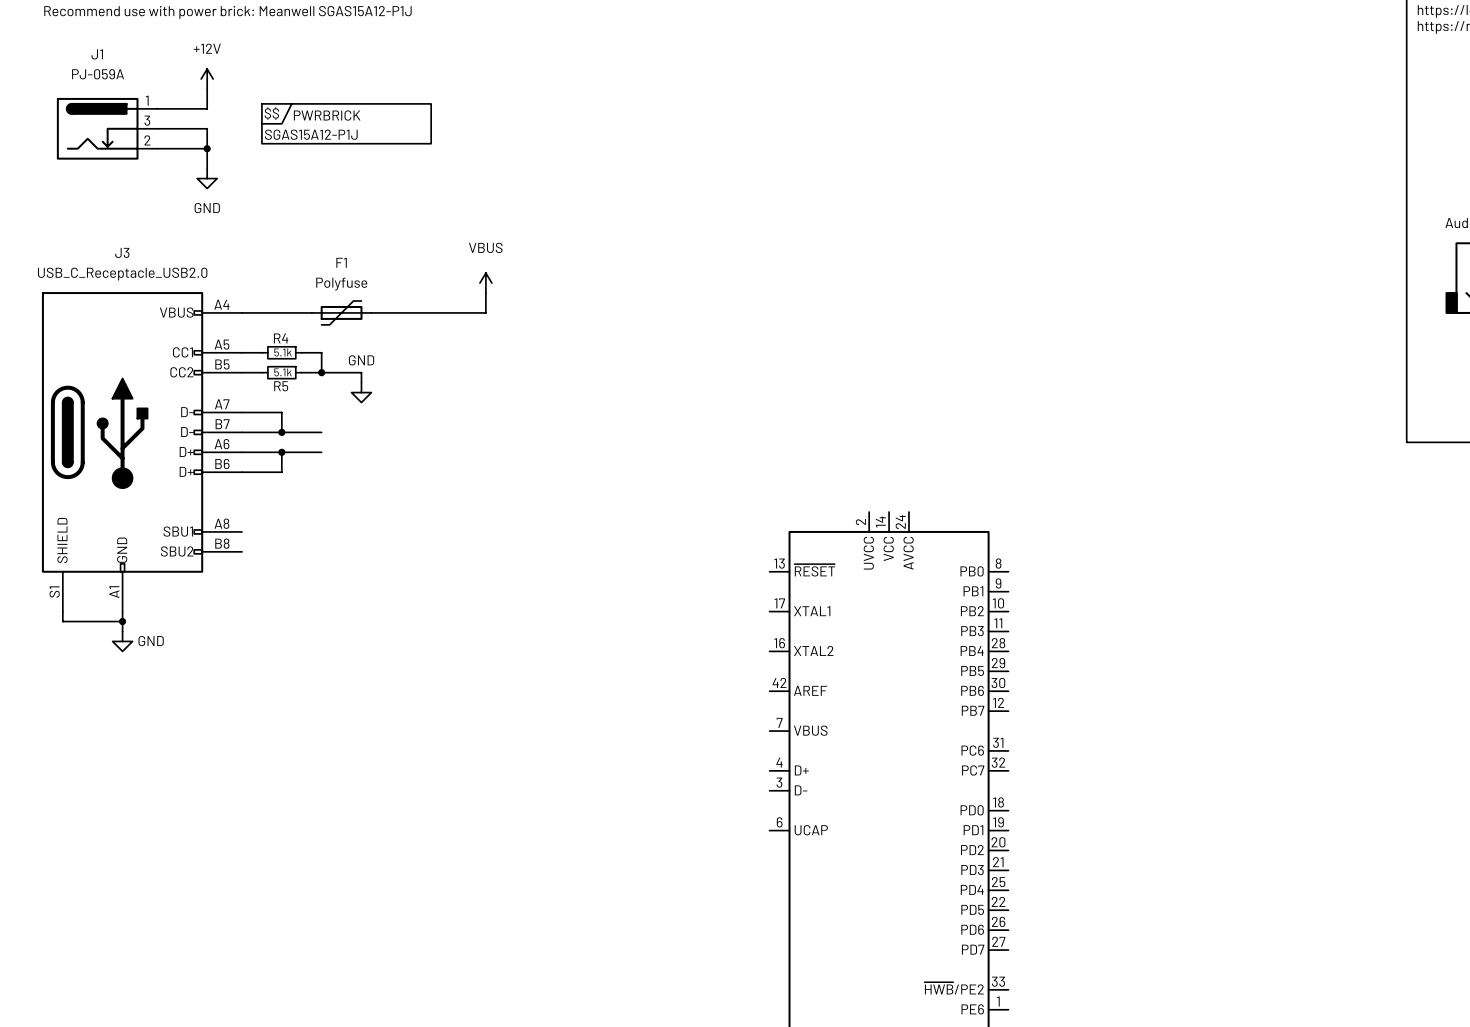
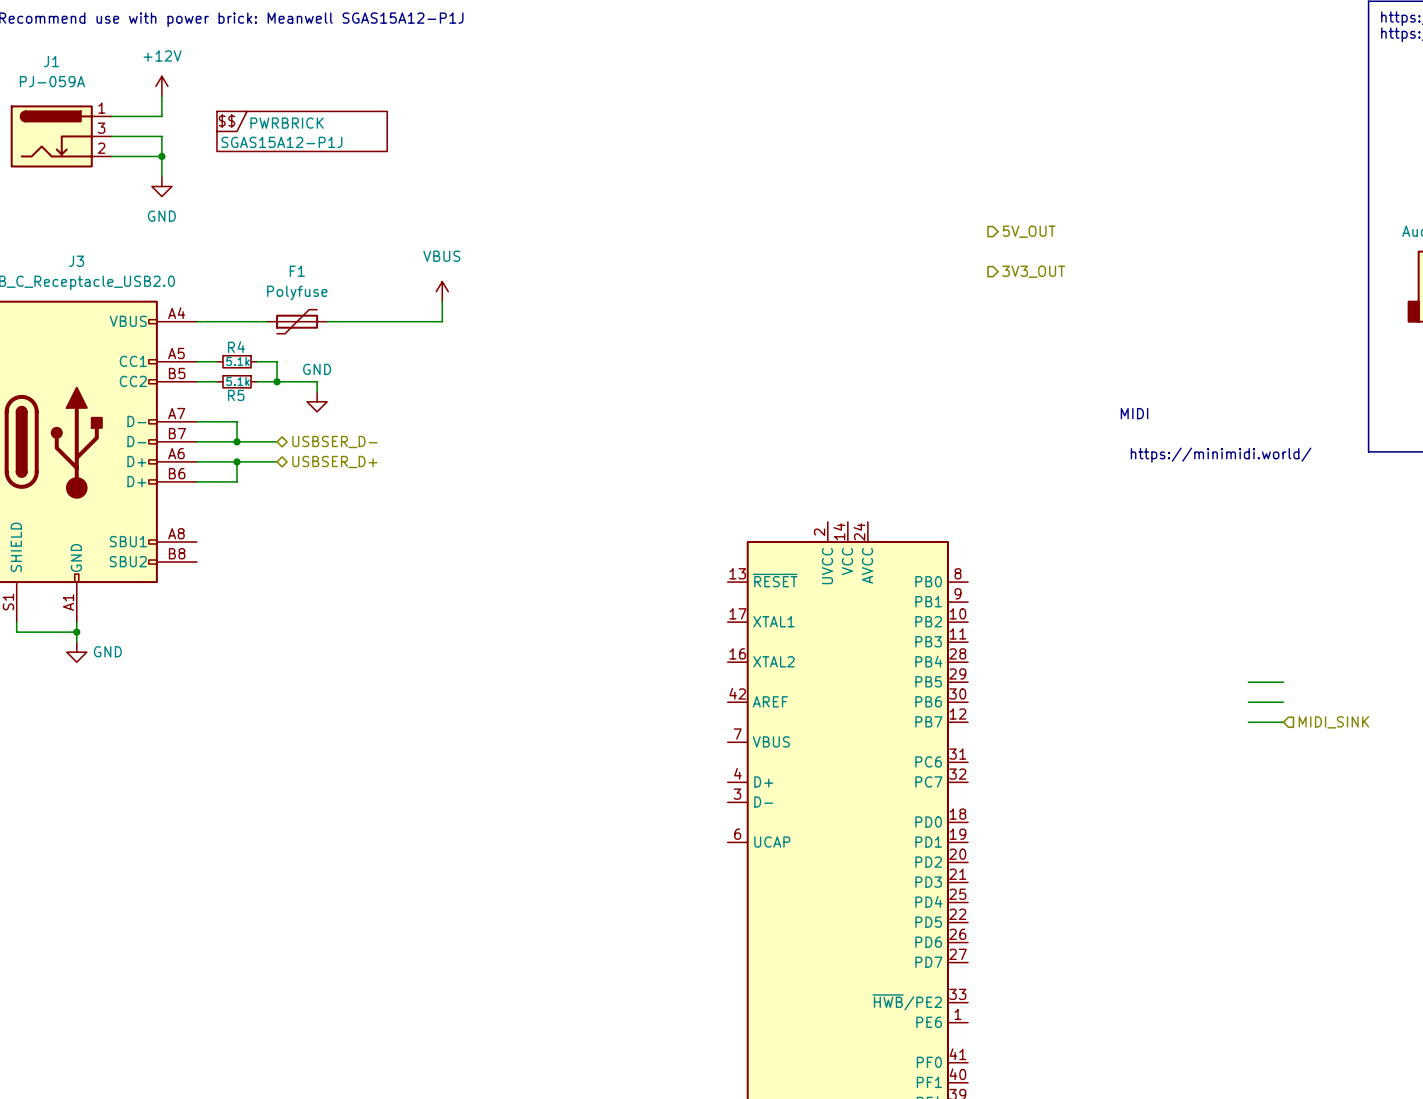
hierarchical label: none -> 5V_OUT (1029, 231)
hierarchical label: none -> 3V3_OUT (1033, 271)
text: none -> MIDI (1134, 413)
hierarchical label: none -> USBSER_D- (334, 441)
text: none -> https://minimidi.world/ (1221, 455)
hierarchical label: none -> USBSER_D+ (334, 461)
wire: none -> (1248, 682) (1283, 682)
wire: none -> (1248, 702) (1283, 702)
hierarchical label: none -> MIDI_SINK (1333, 722)
wire: none -> (1248, 722) (1283, 722)

